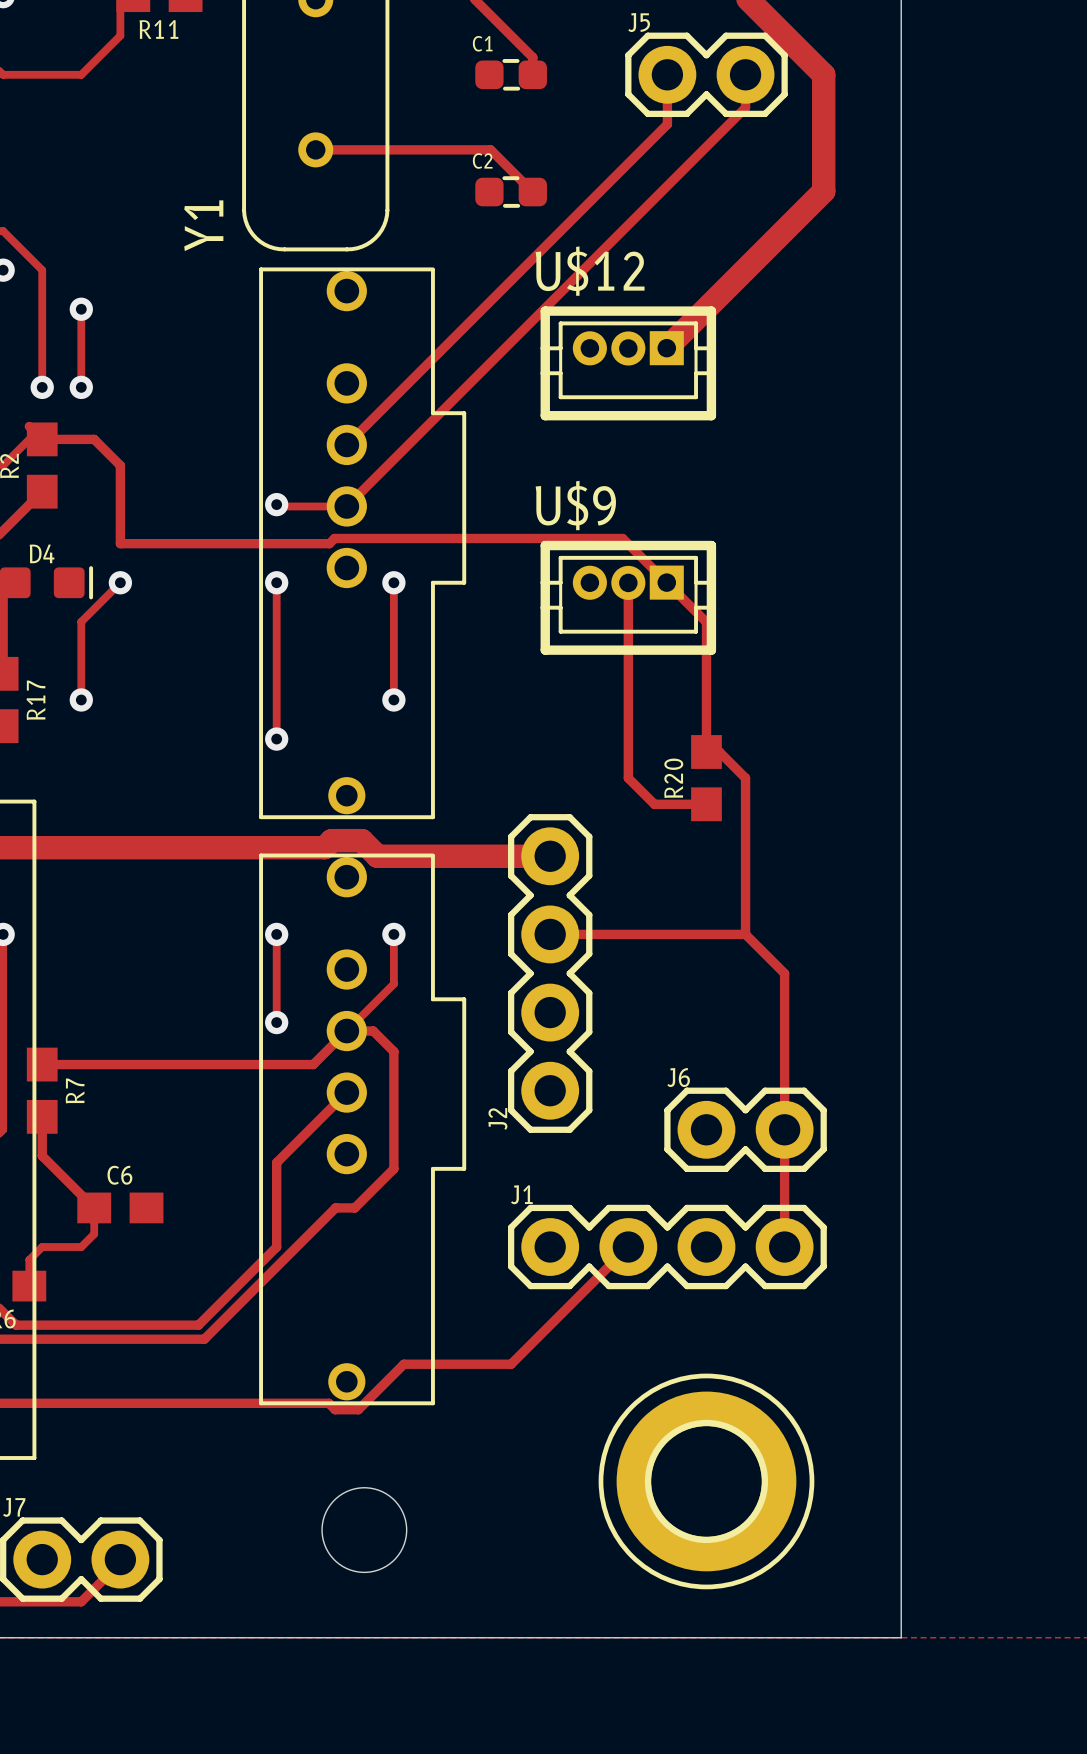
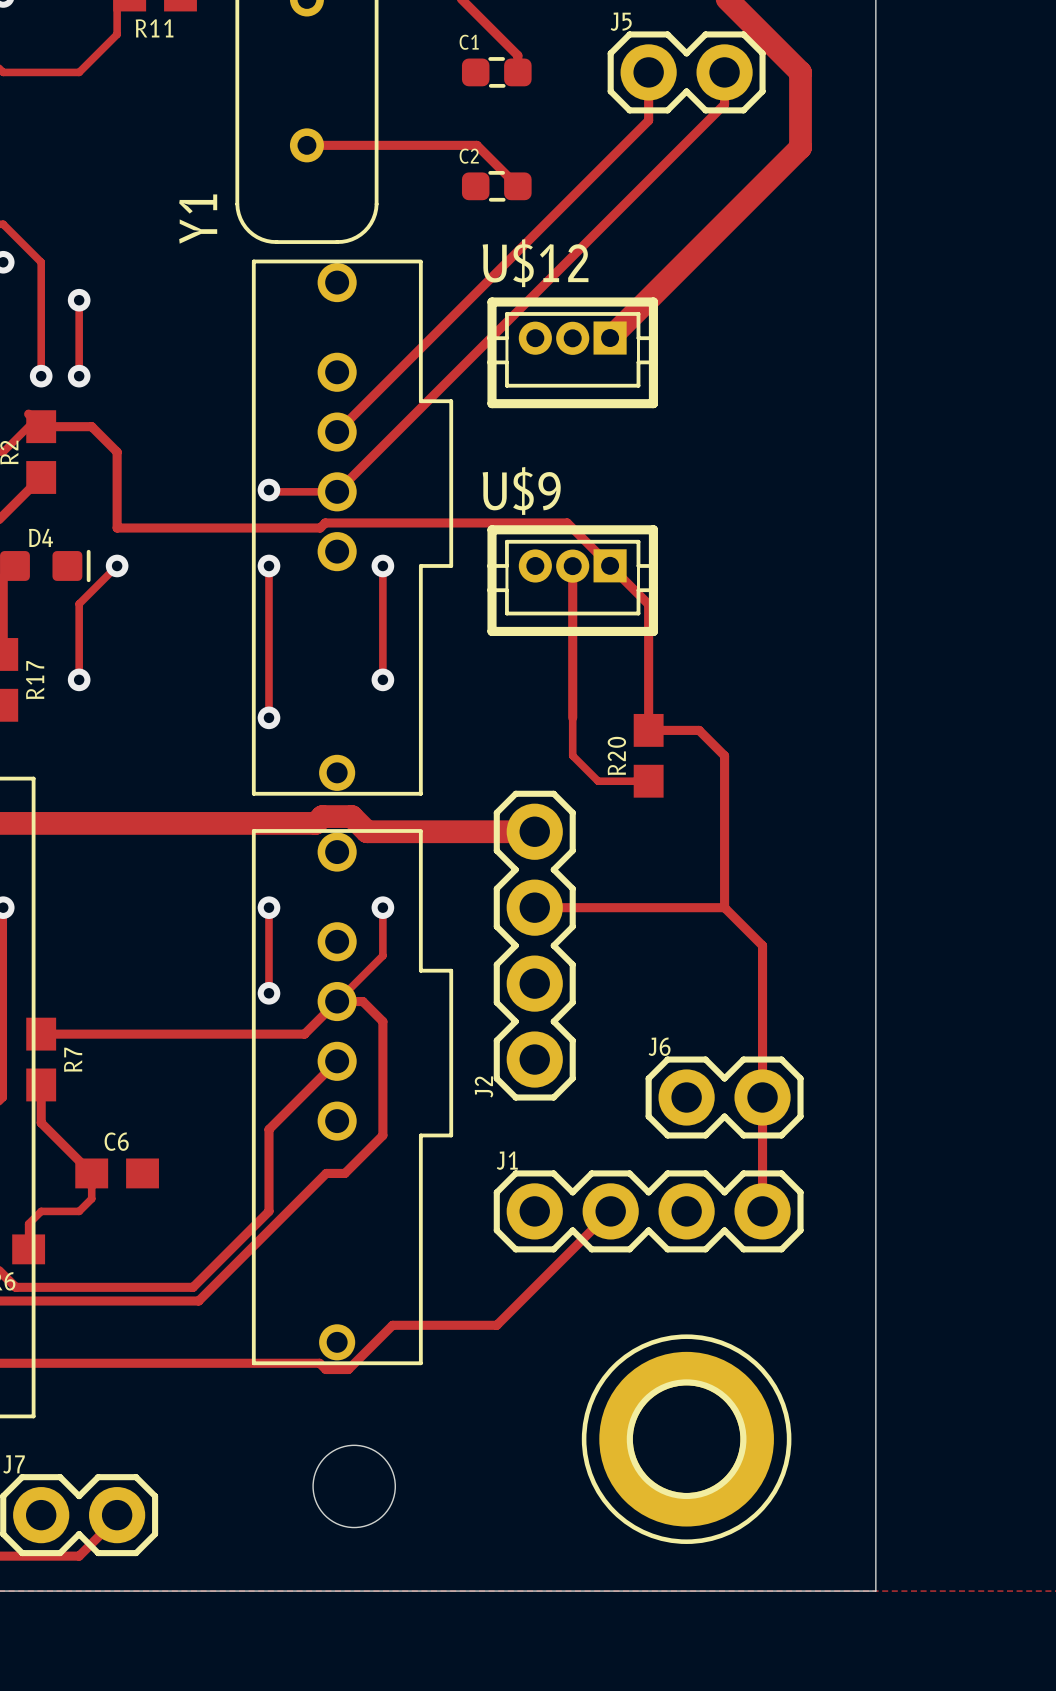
track: (823, 152) (823, 191) (666, 348) -> (800, 147) (610, 338)
U$12 position: (628, 363) -> (572, 352)
track: (583, 538) (622, 538) (706, 622) (706, 751) -> (567, 522) (648, 604) (648, 730) (686, 730)
track: (628, 582) (628, 778) (654, 804) -> none
U$9 position: (628, 597) -> (572, 580)
R20 position: (706, 778) -> (648, 755)
track: (667, 804) (706, 804) -> (648, 781) (598, 781) (572, 755) (572, 566)

